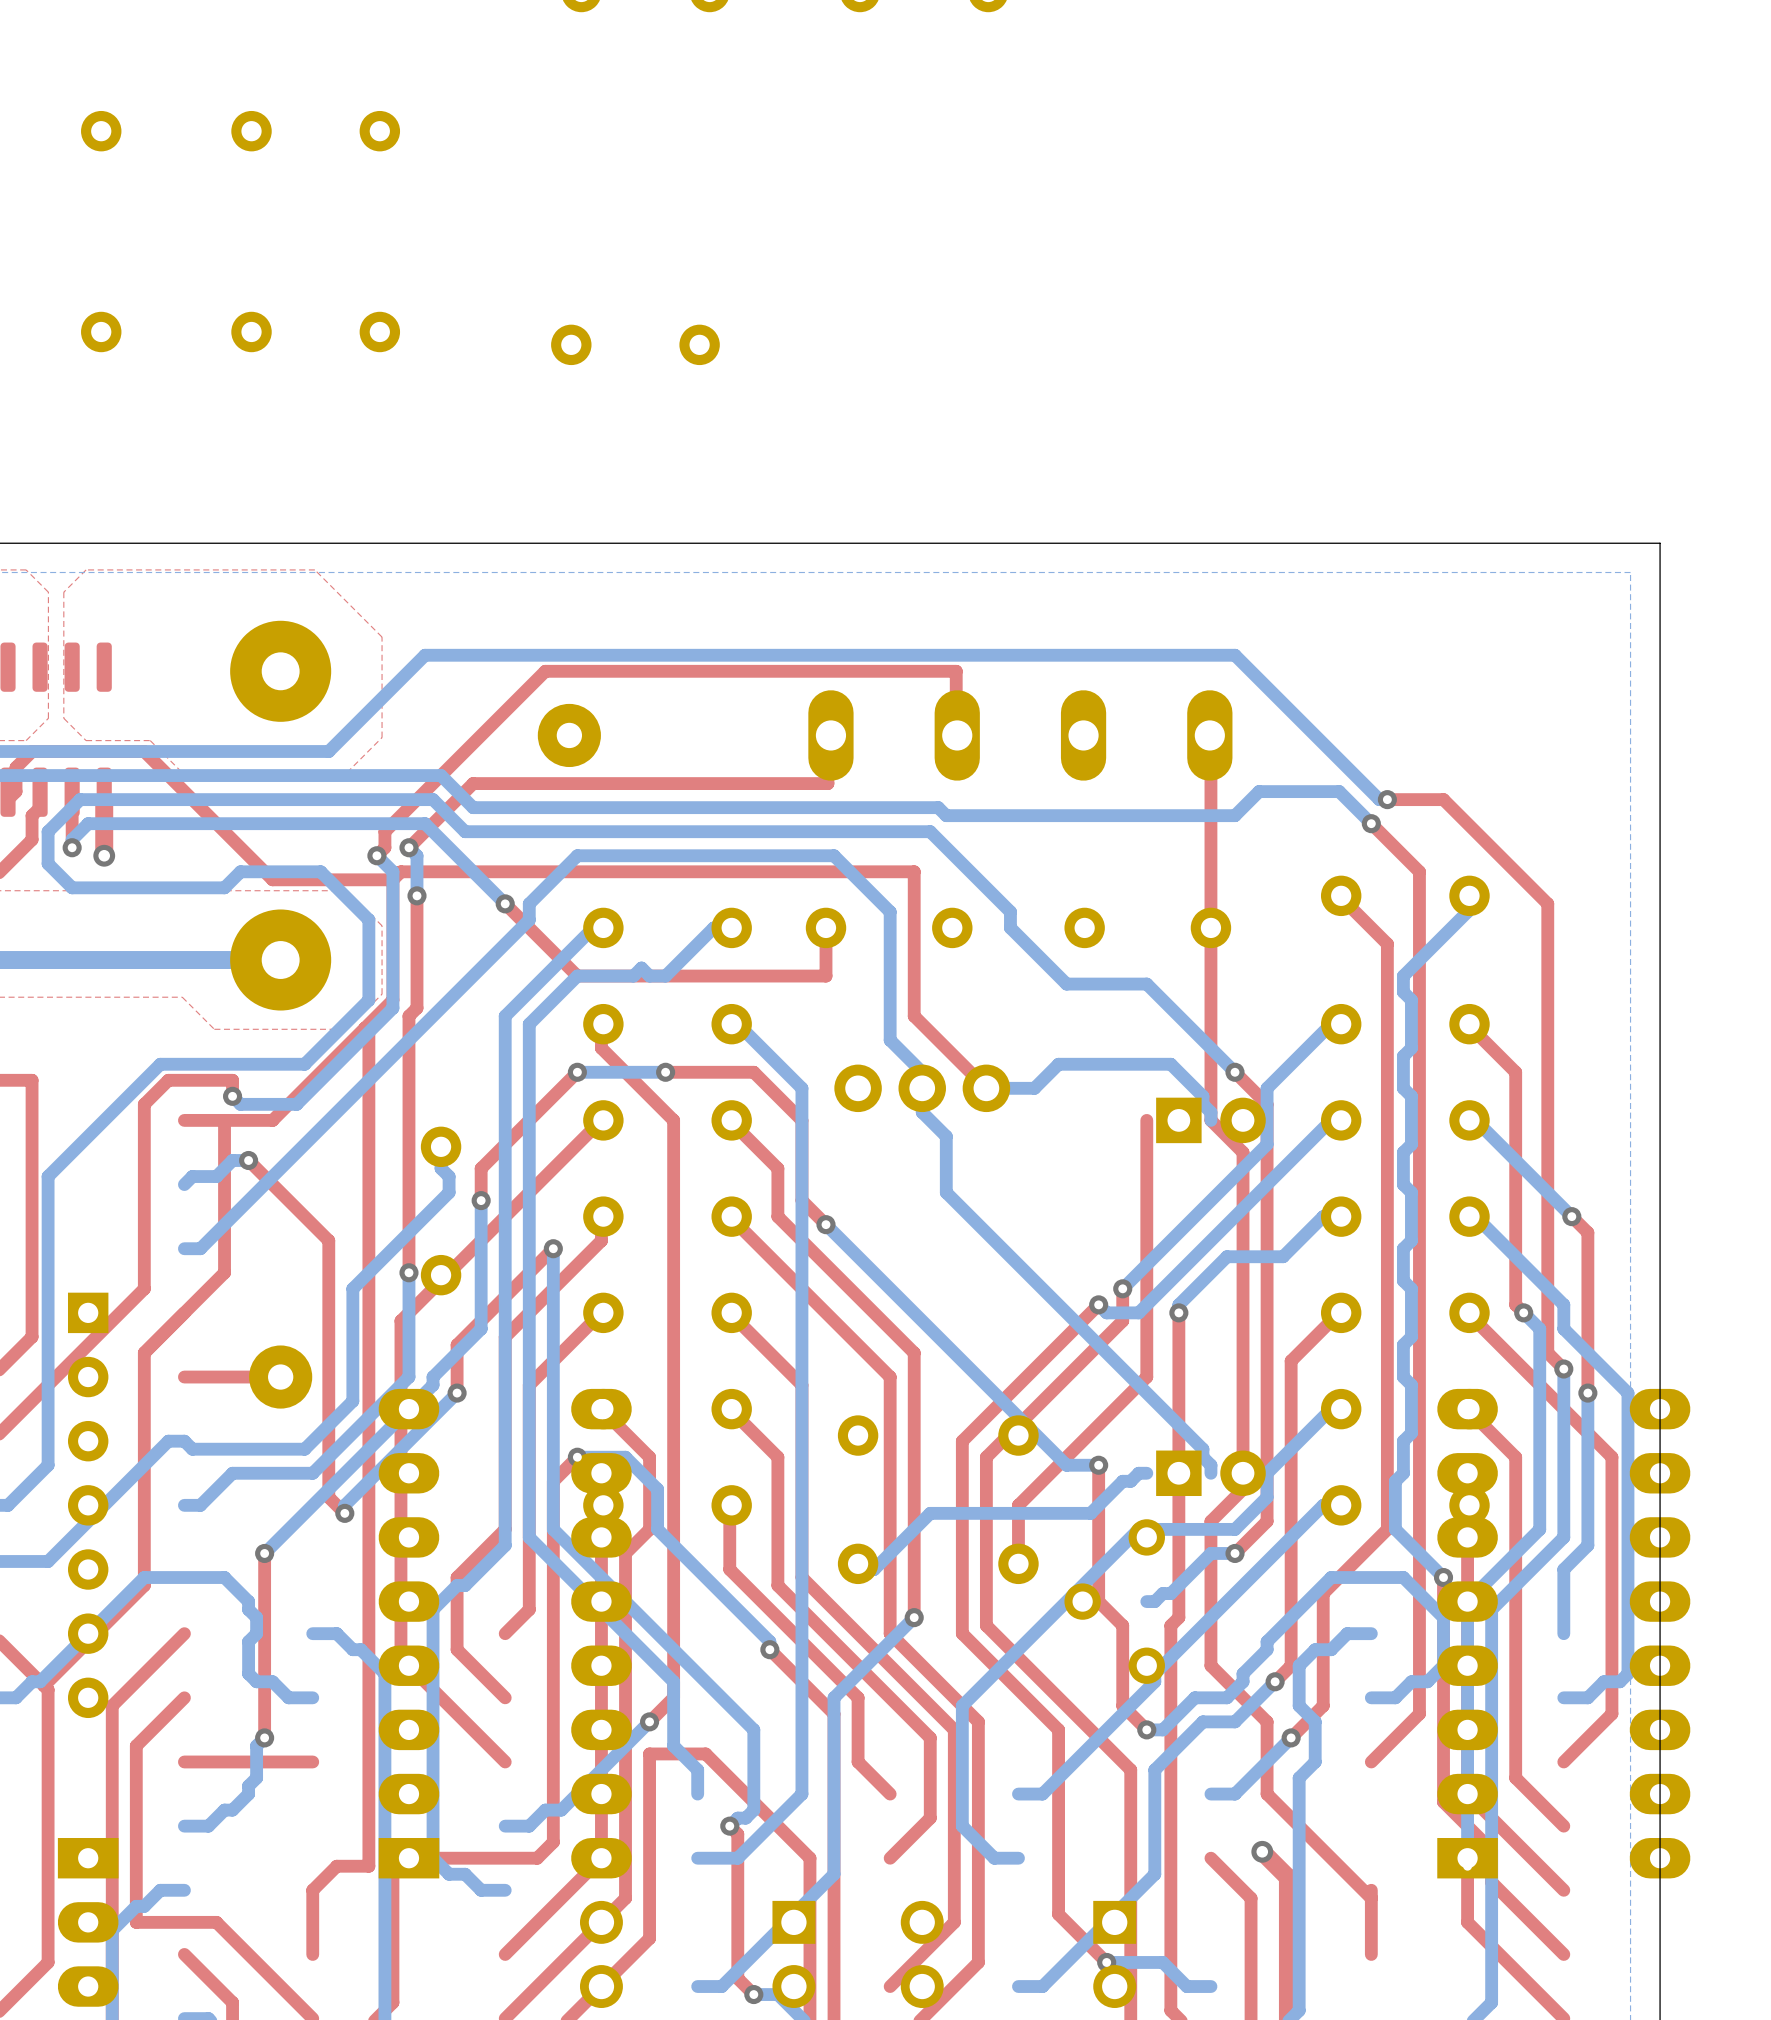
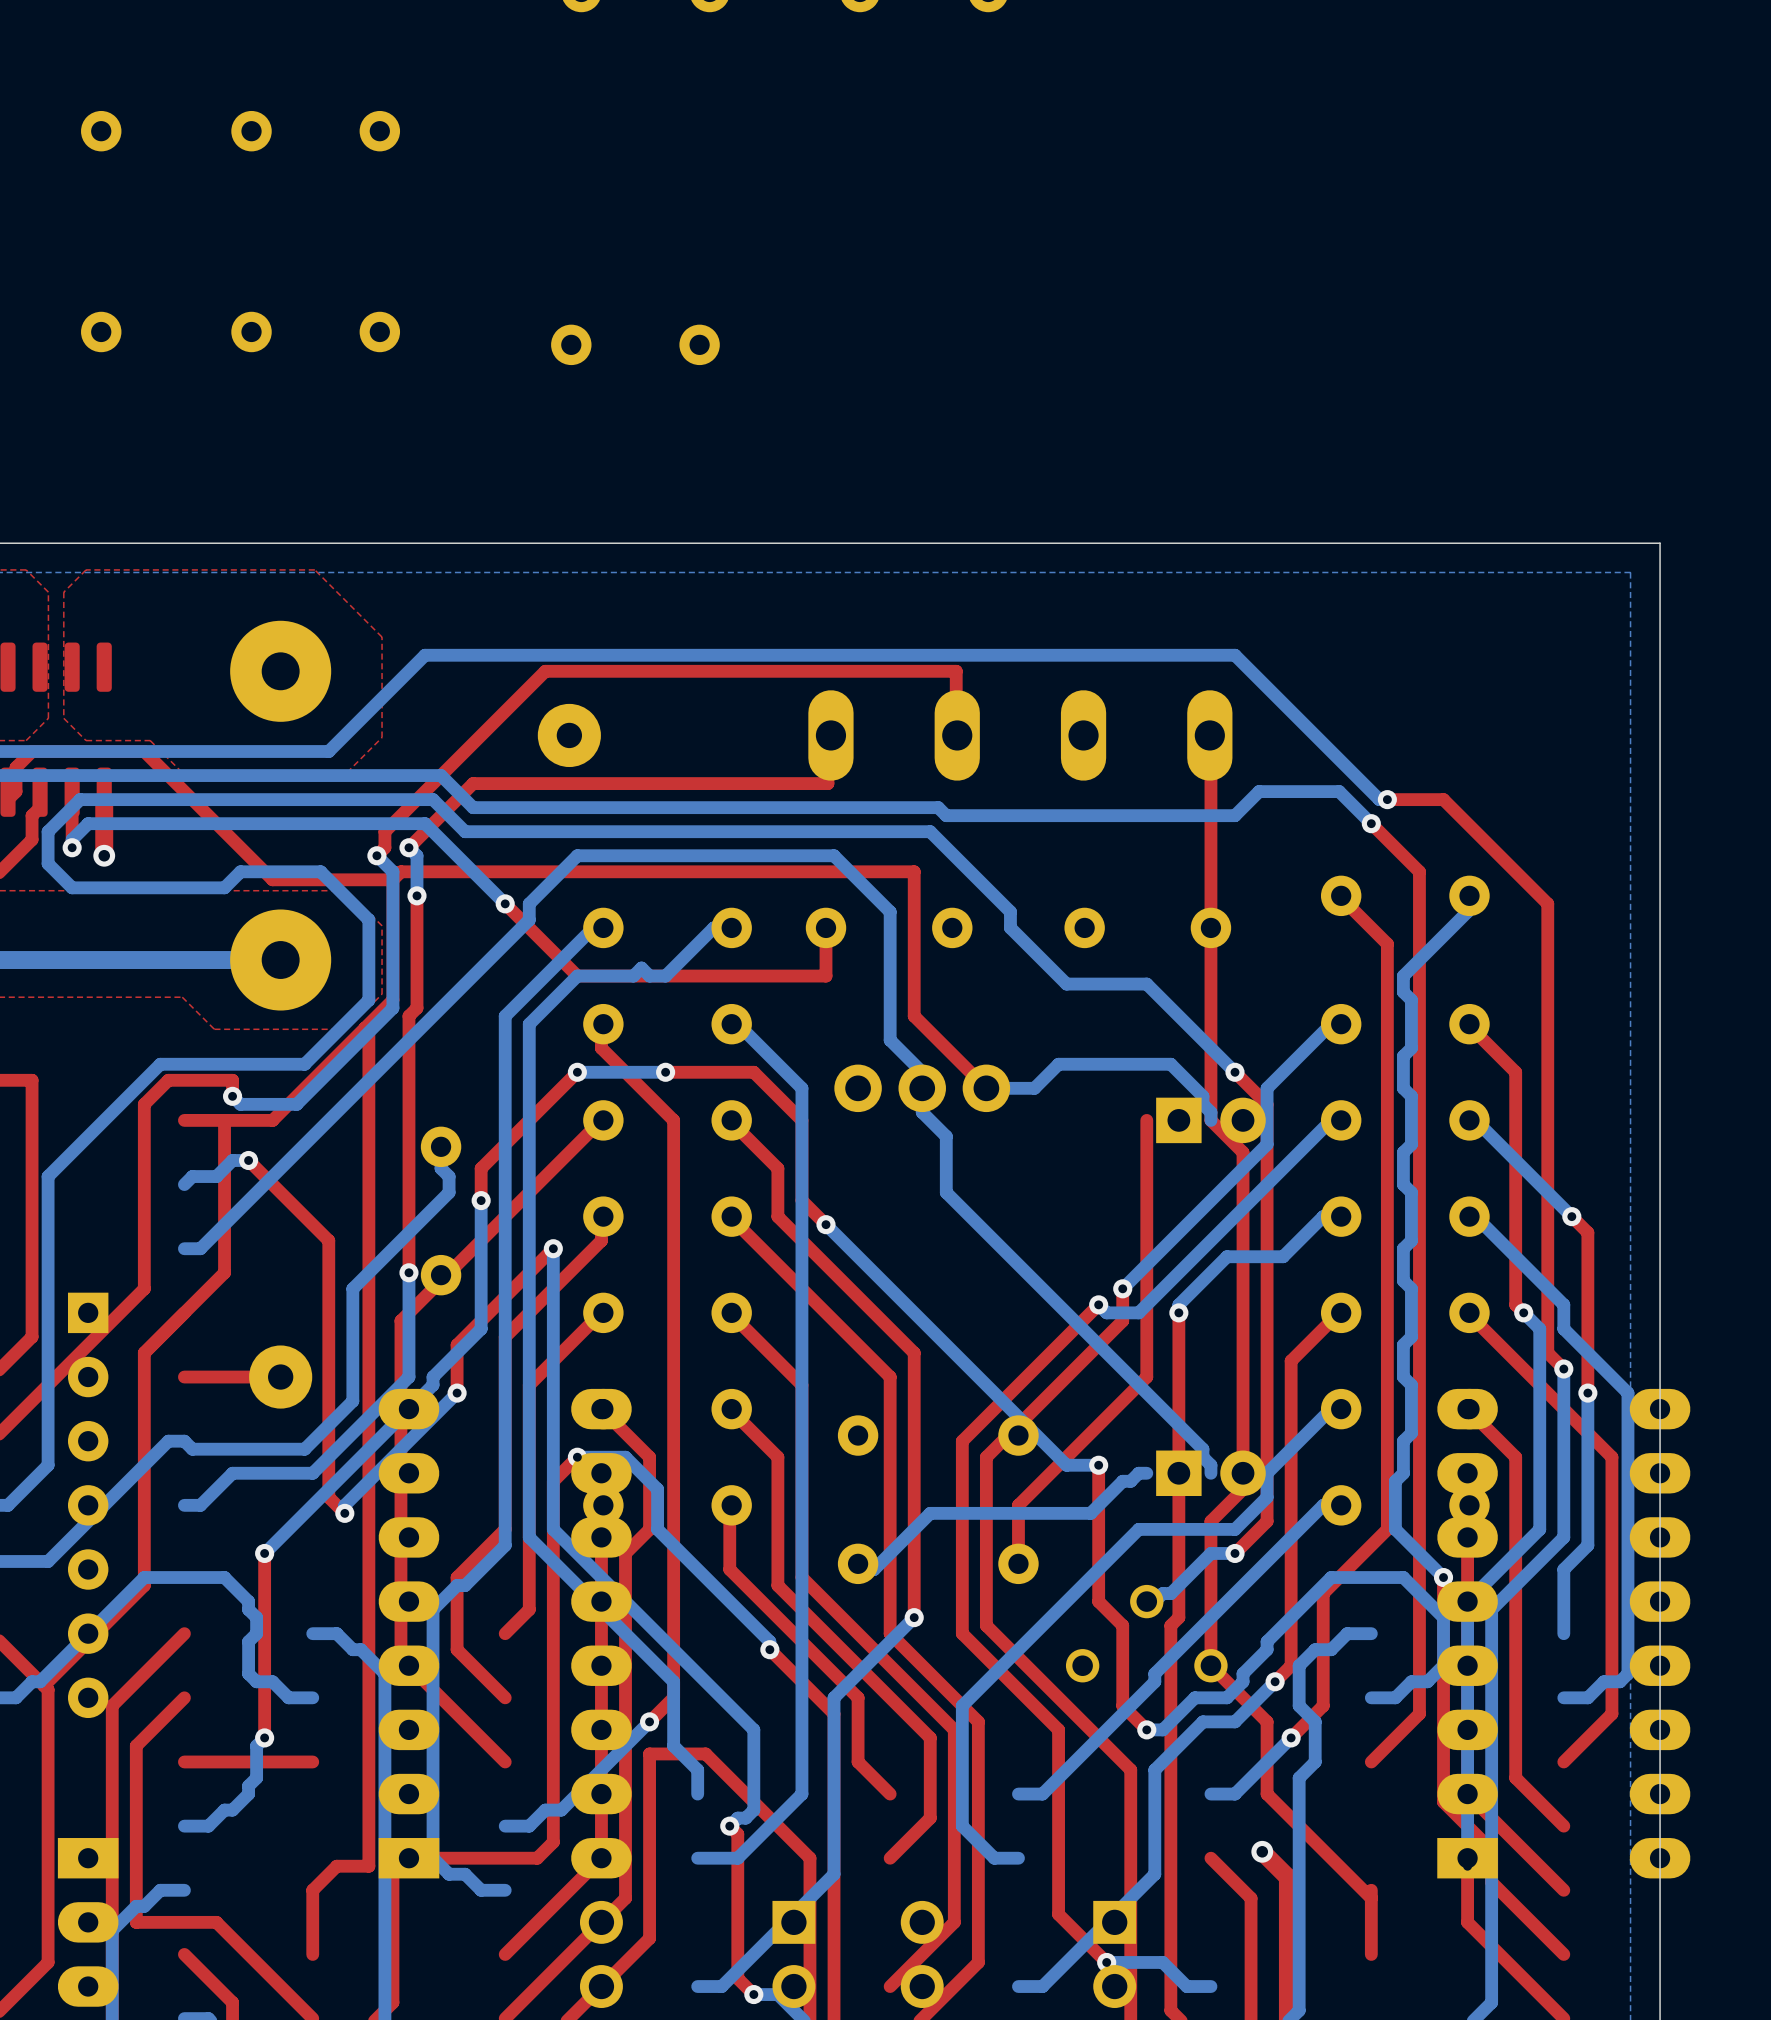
part: (1114, 1601) -> none
part: none -> (1146, 1633)

